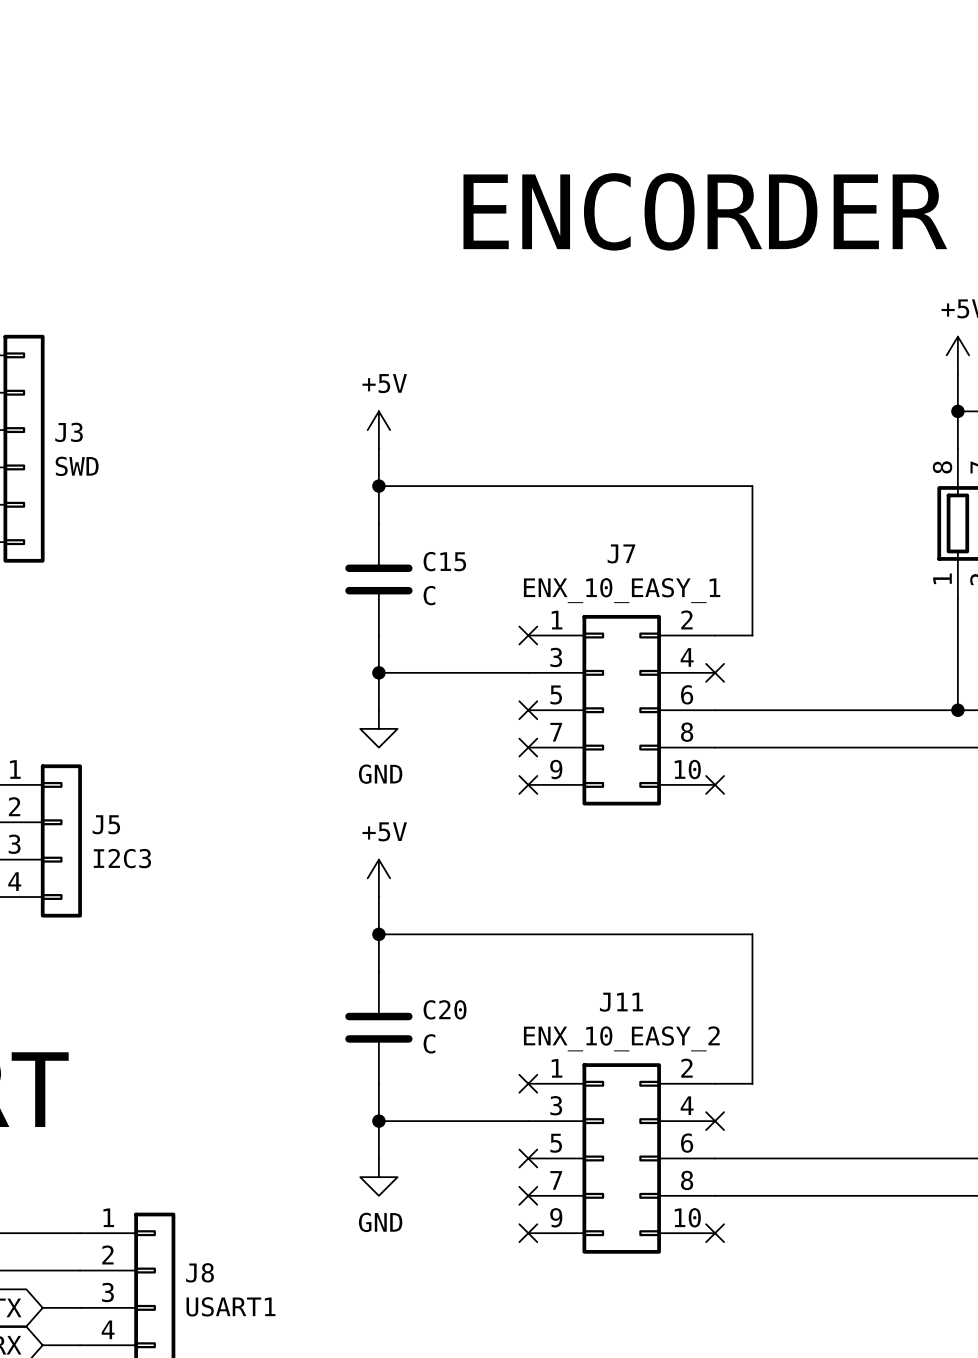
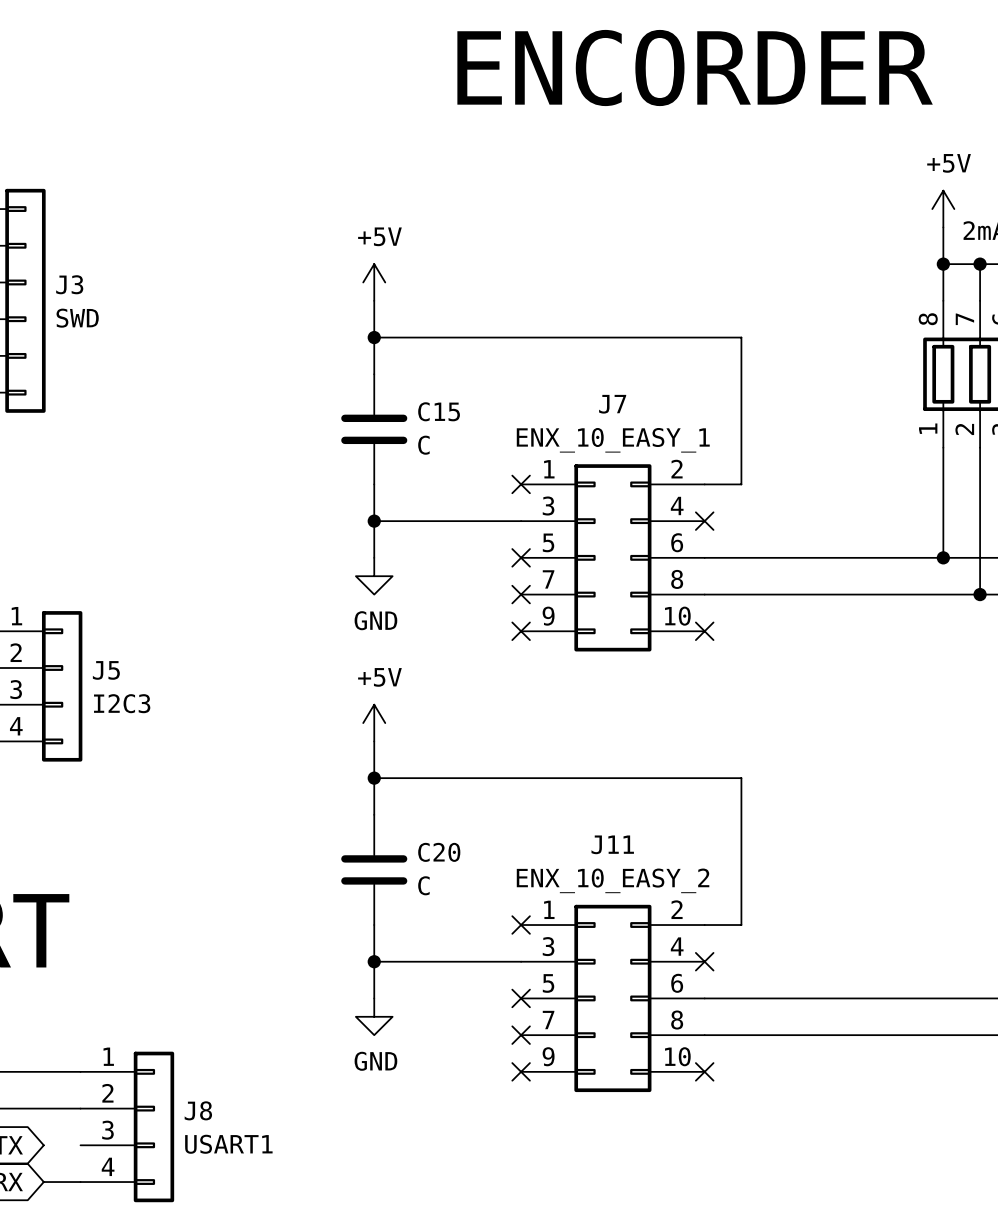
wire: (42, 1307) (80, 1307) -> none

